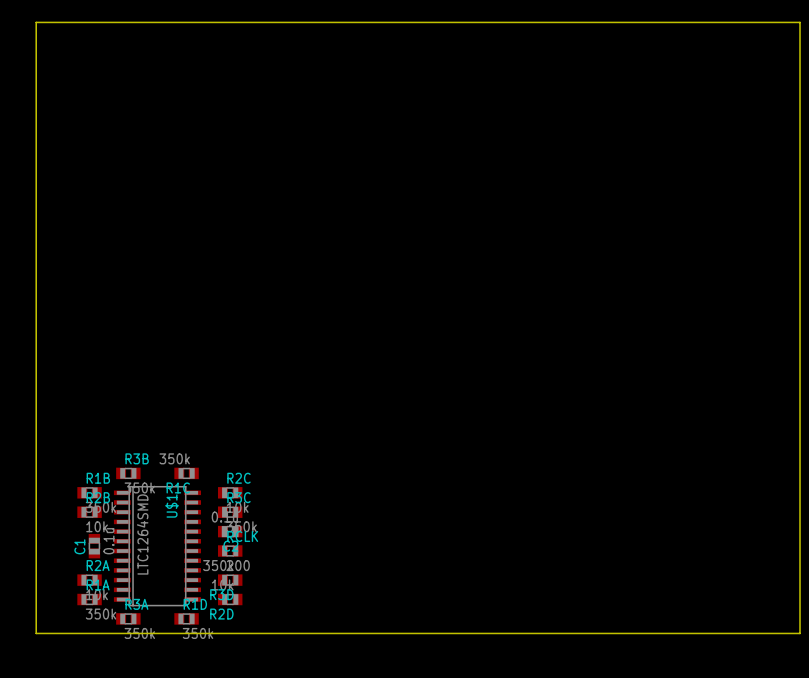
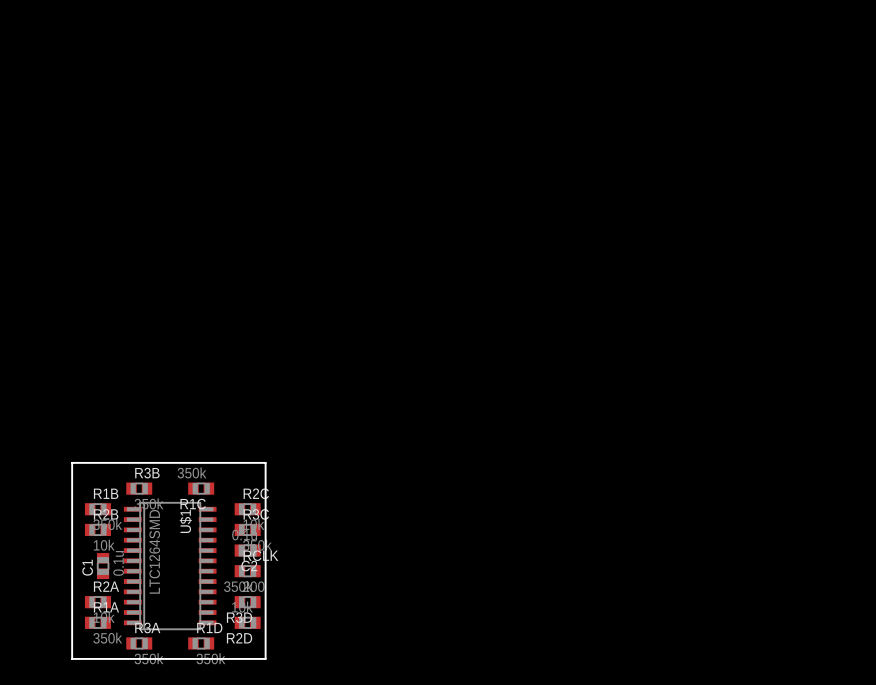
board edge: (65, 633) (36, 633) (36, 22) (800, 22) (800, 633) (247, 633) -> (72, 658) (72, 462) (265, 462) (265, 658)

